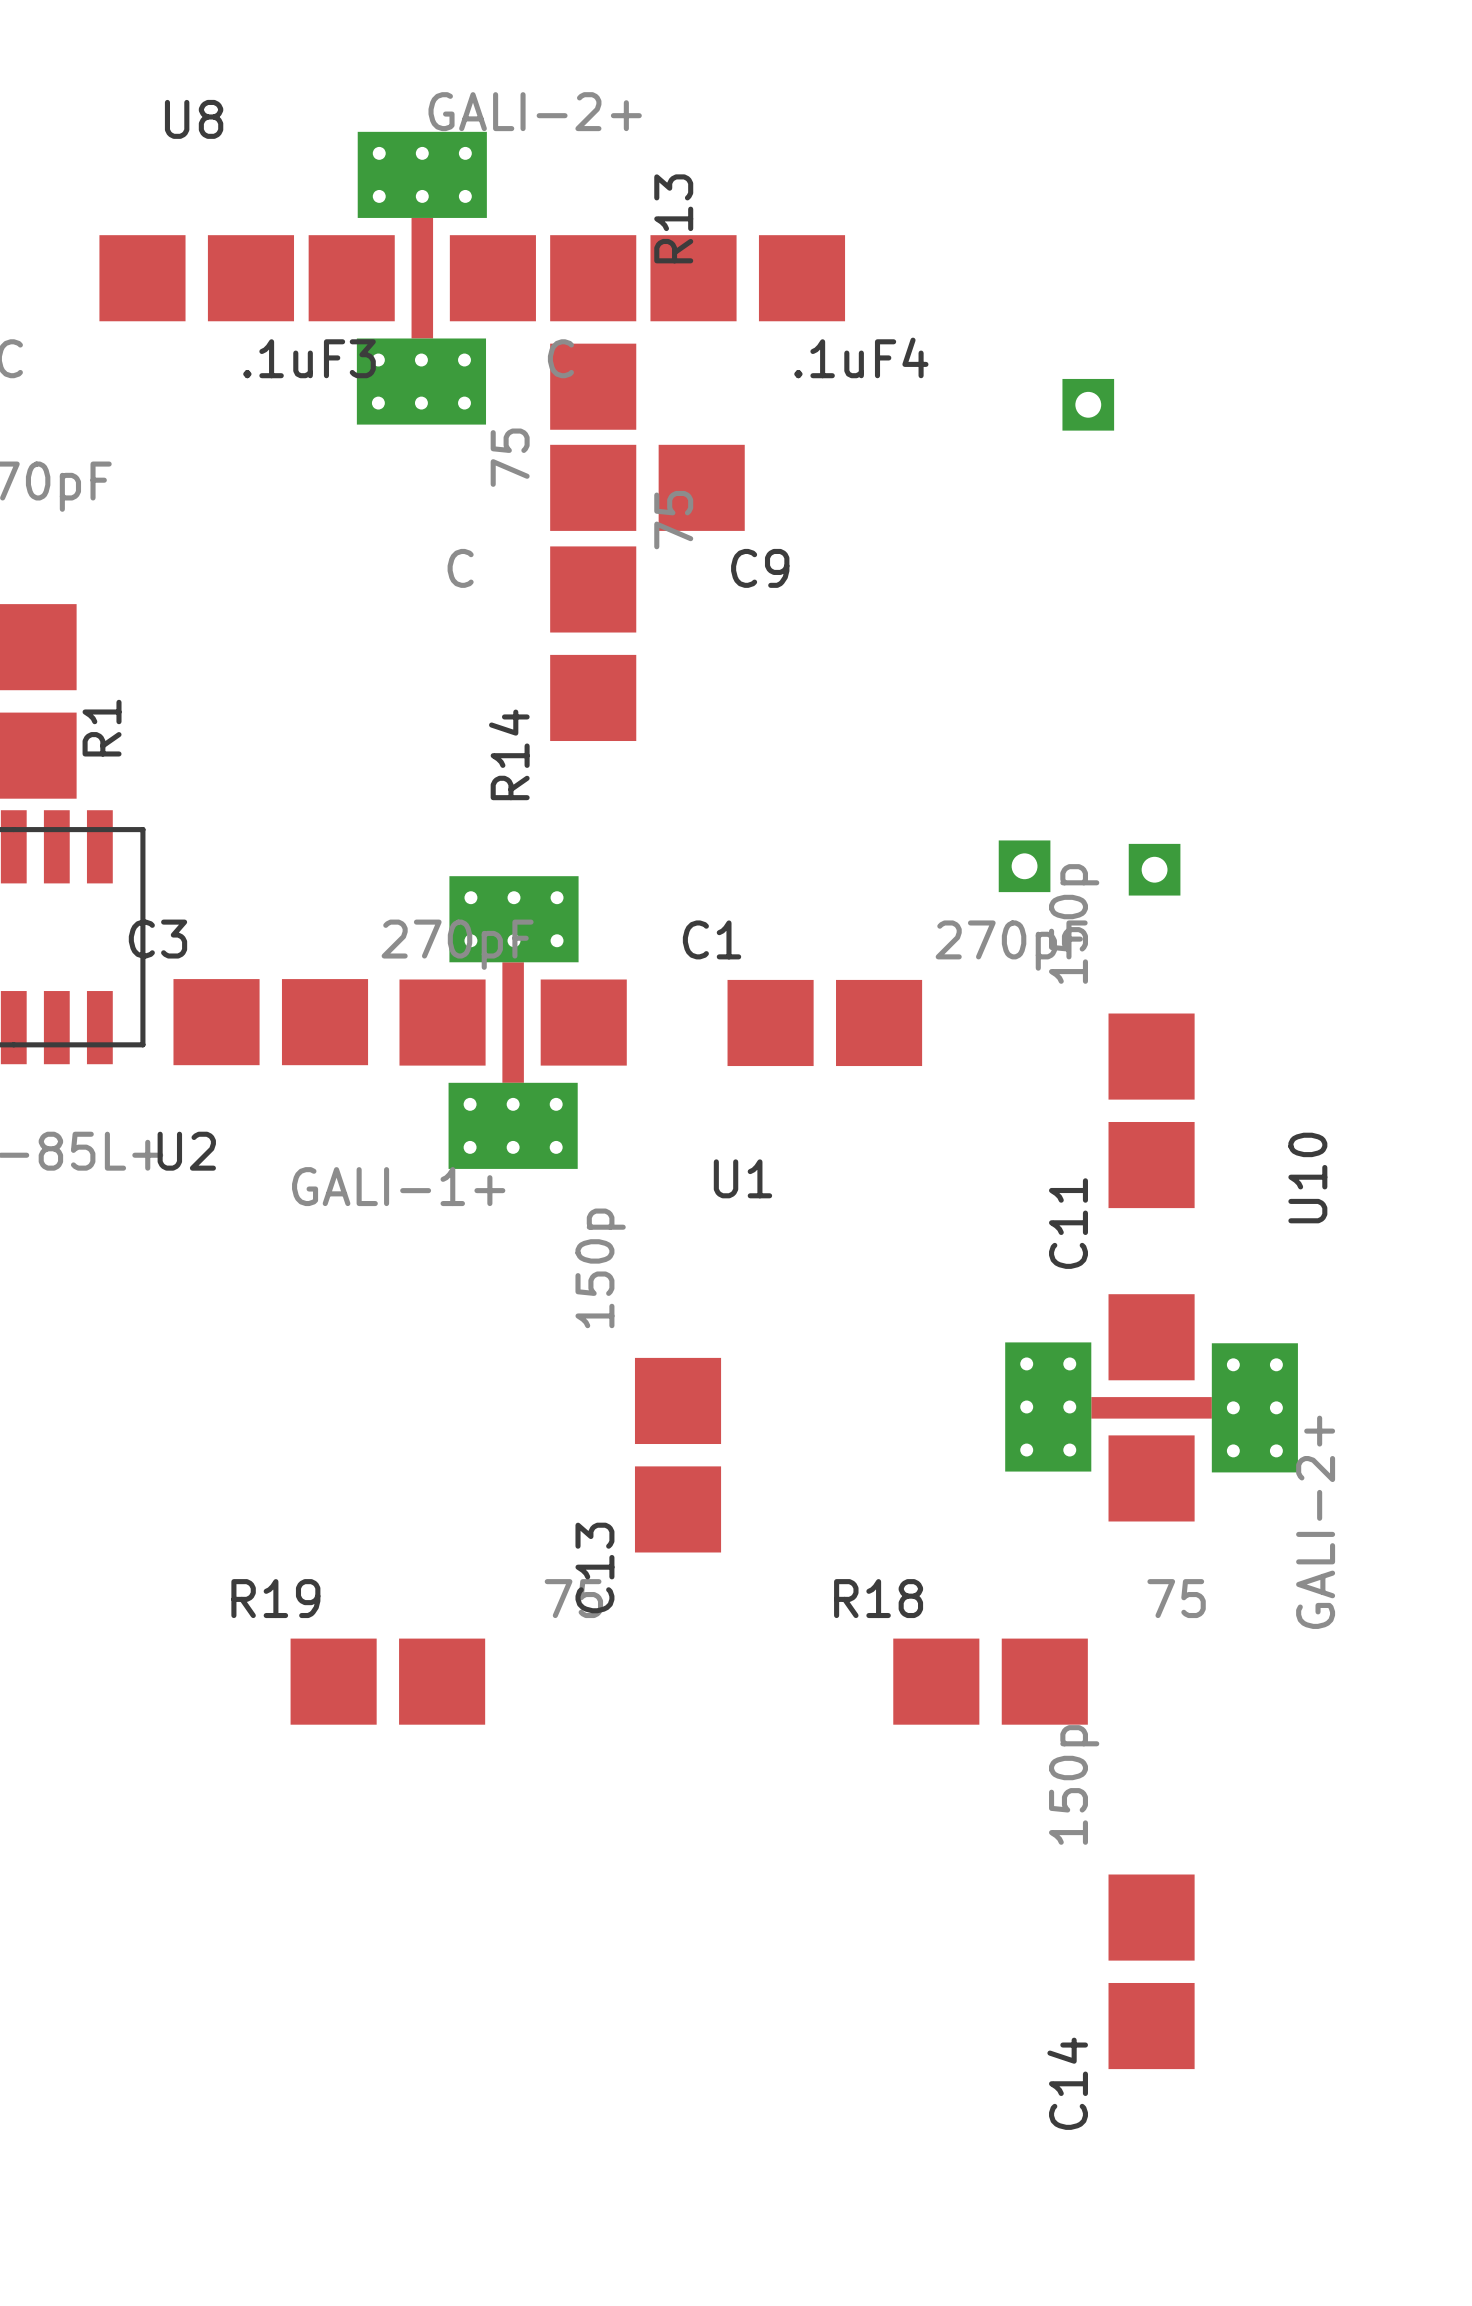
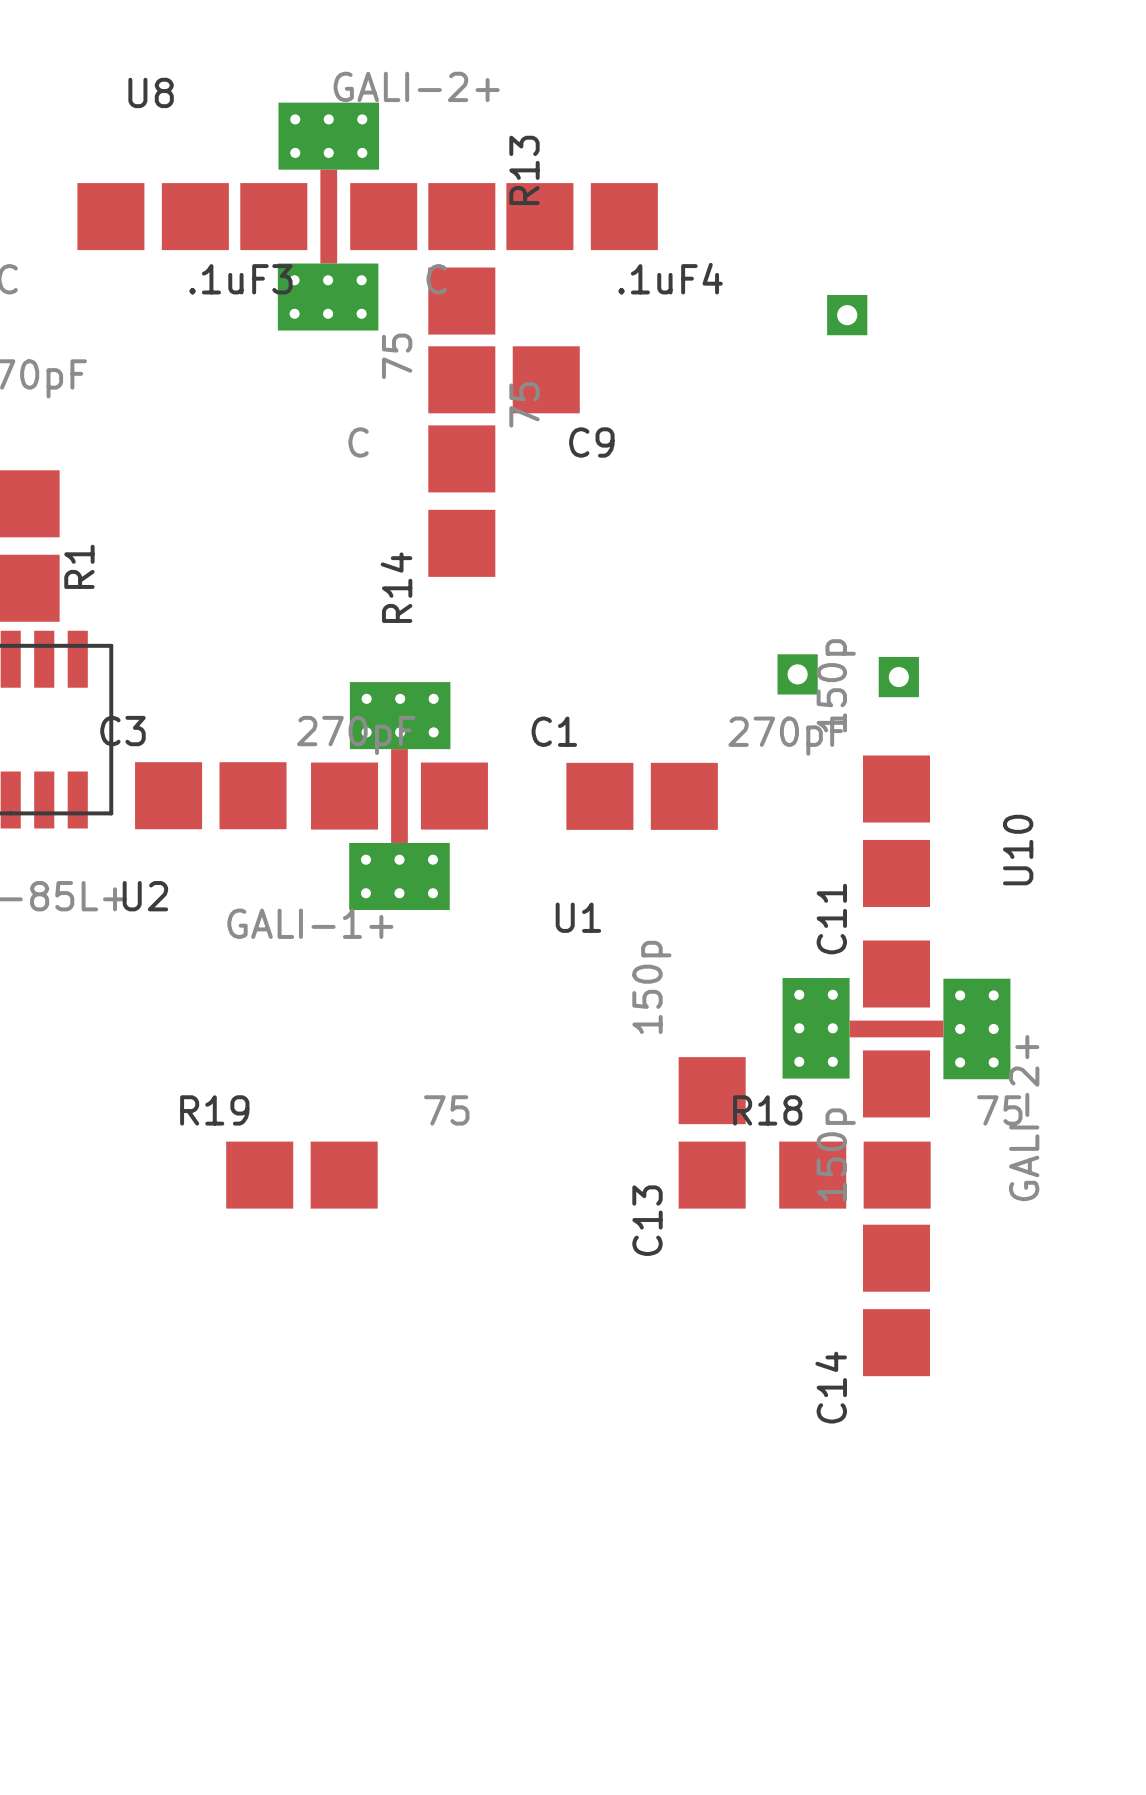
C11 position: (1151, 1110) -> (896, 831)
U10 position: (1151, 1407) -> (896, 1028)
C13 position: (678, 1455) -> (712, 1132)
R19 position: (387, 1681) -> (301, 1175)
R18 position: (990, 1681) -> (854, 1175)
C14 position: (1151, 1971) -> (896, 1300)

